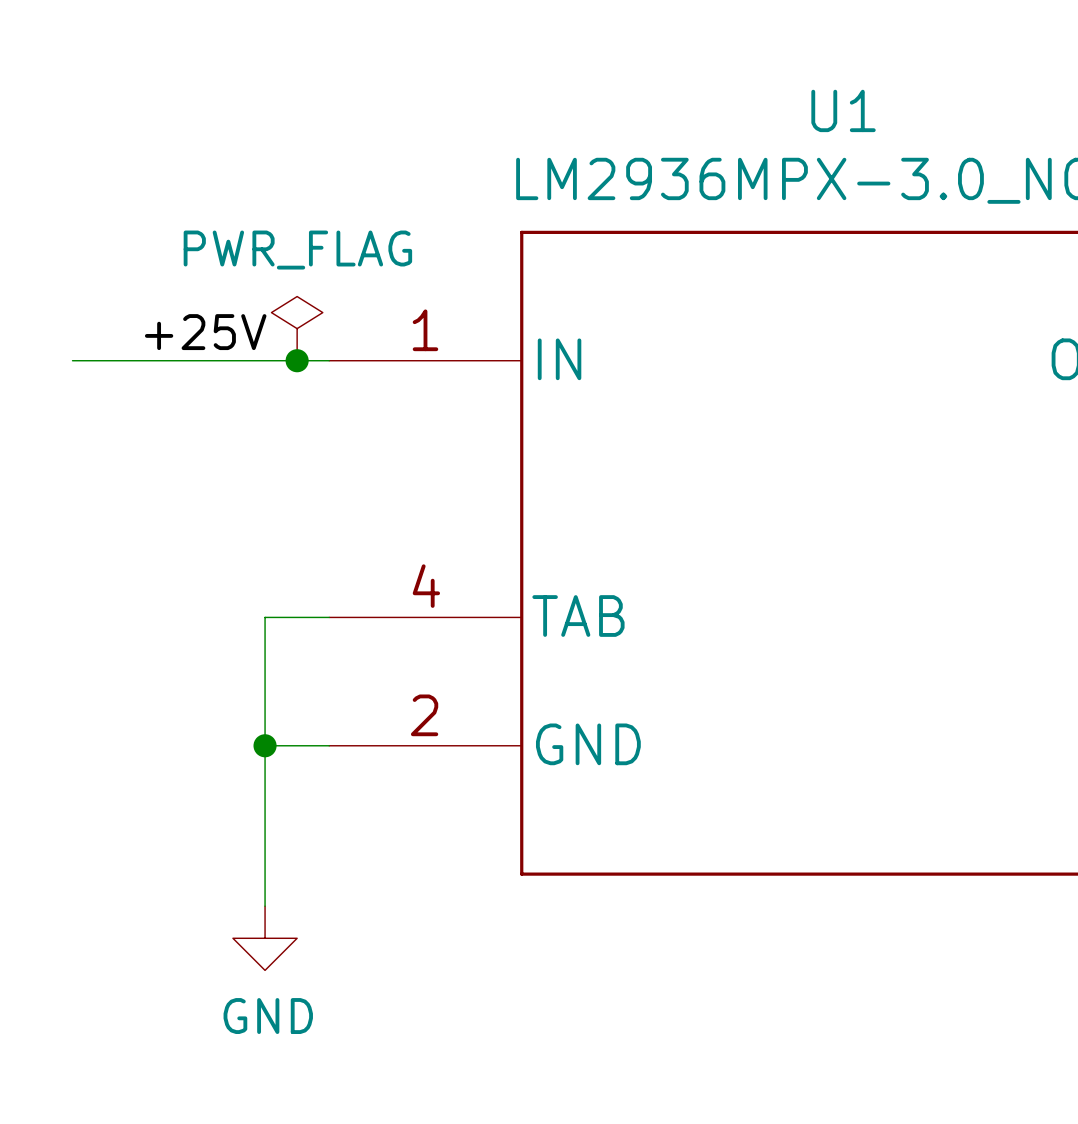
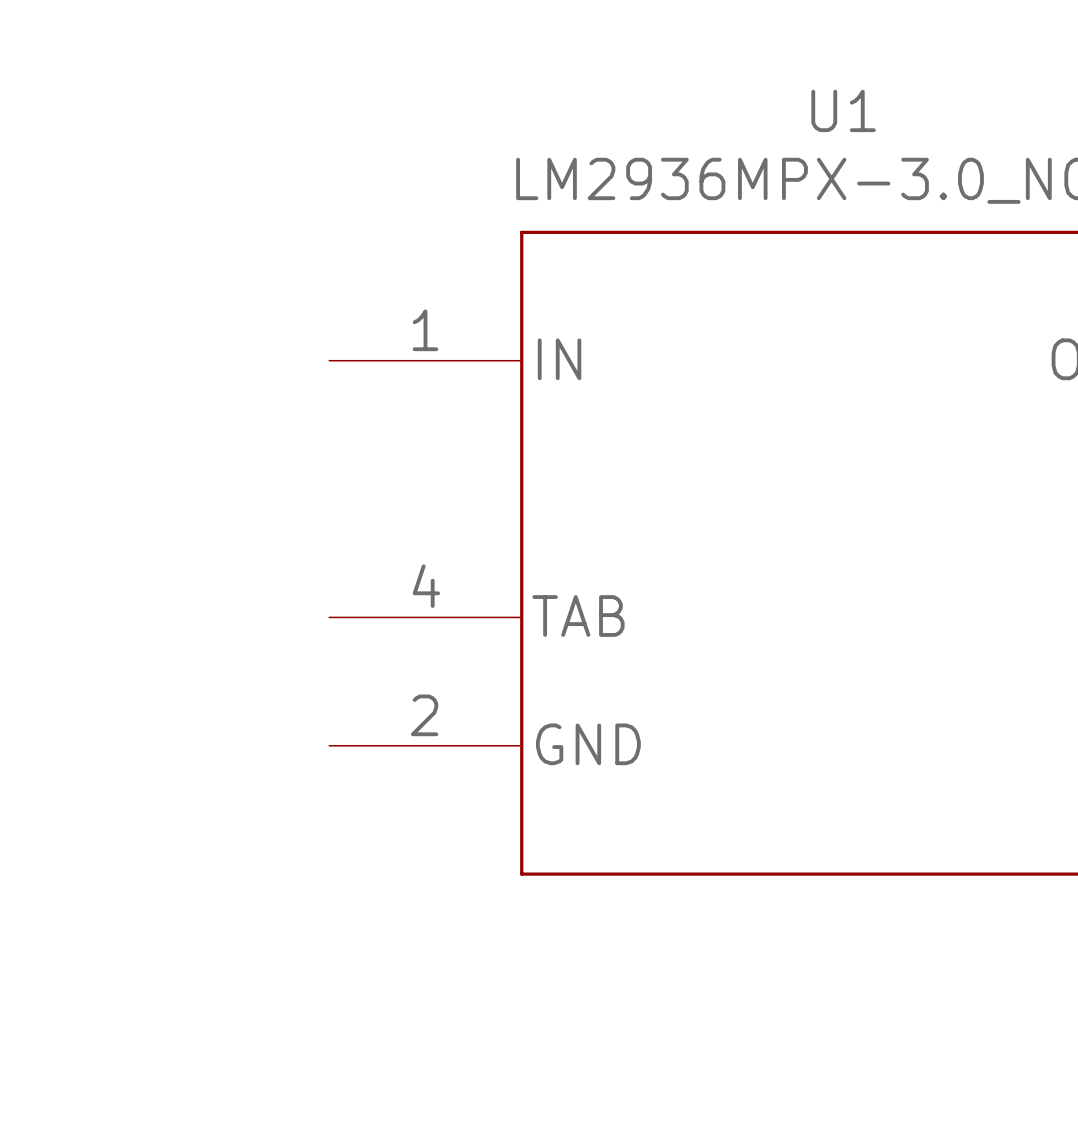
power symbol: PWR_FLAG (297, 328) -> none
label: +25V (205, 332) -> none
wire: (72, 360) (329, 360) -> none
junction: (297, 360) -> none
wire: (329, 617) (265, 617) (265, 906) -> none
wire: (265, 745) (329, 745) -> none
junction: (265, 745) -> none
power symbol: GND (265, 938) -> none

